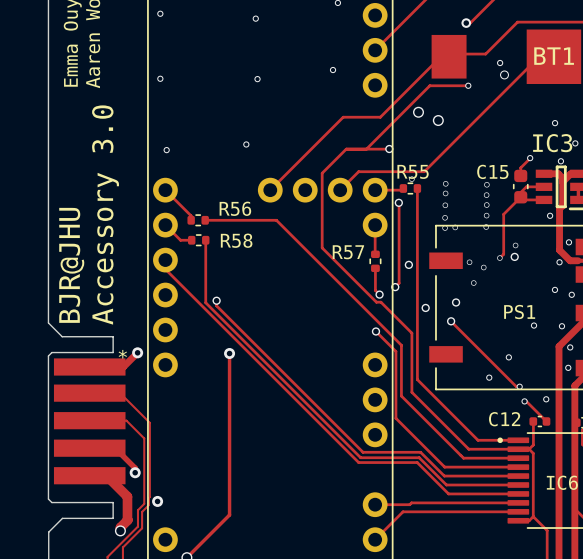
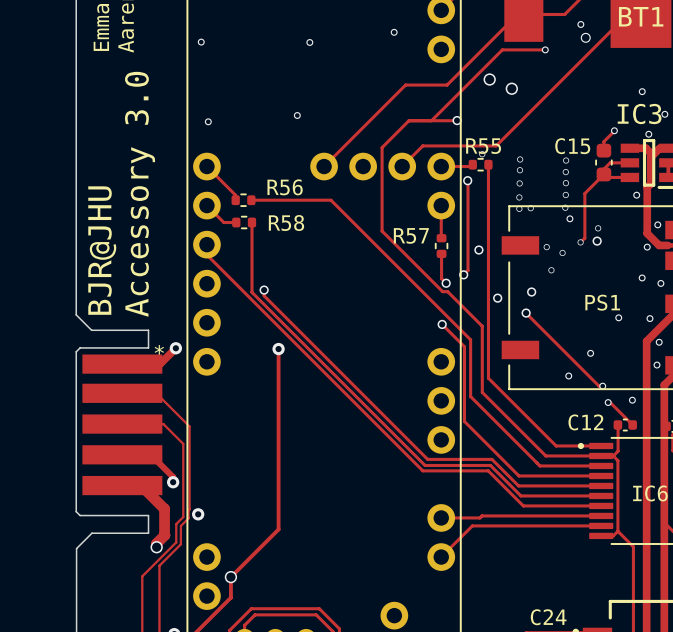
via: none -> (569, 218)

